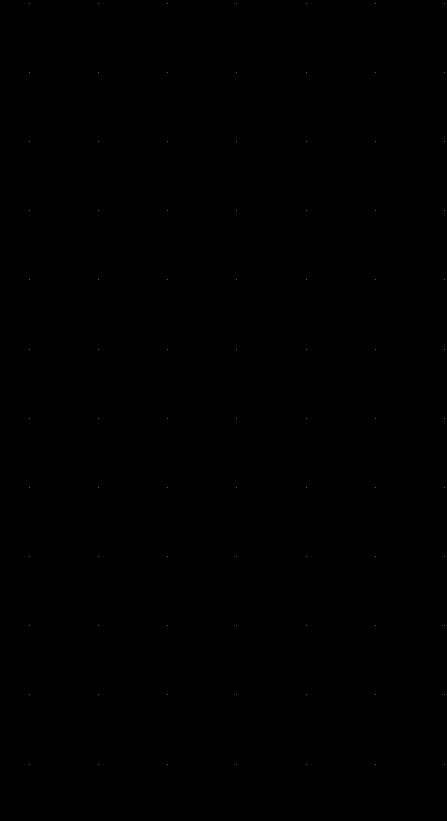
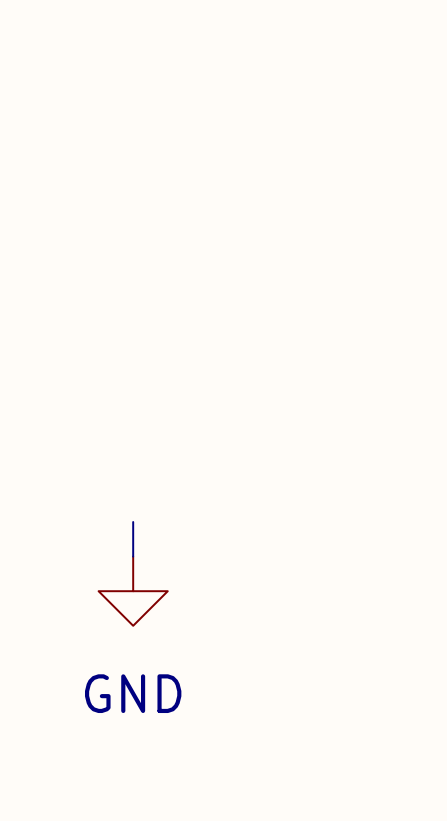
wire: none -> (133, 522) (133, 556)
power symbol: none -> GND (133, 591)

